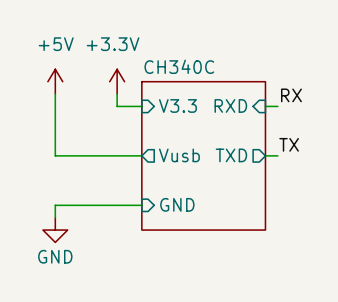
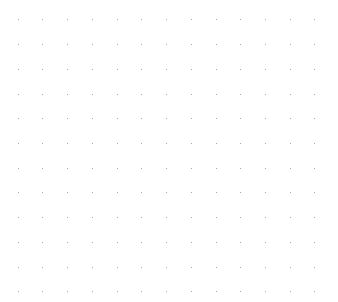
power symbol: +5V (55, 81) -> none
power symbol: +3.3V (117, 81) -> none
wire: (55, 94) (55, 155) (141, 155) -> none
wire: (117, 94) (117, 106) (141, 106) -> none
label: RX (291, 95) -> none
sheet pin: V3.3 (177, 105) -> none
sheet pin: RXD (230, 105) -> none
wire: (265, 106) (277, 106) -> none
label: TX (289, 144) -> none
sheet pin: Vusb (179, 155) -> none
sheet CH340C: (203, 155) -> none
sheet pin: TXD (231, 155) -> none
wire: (265, 155) (277, 155) -> none
sheet pin: GND (177, 204) -> none
wire: (141, 205) (55, 205) (55, 217) -> none
power symbol: GND (55, 230) -> none

